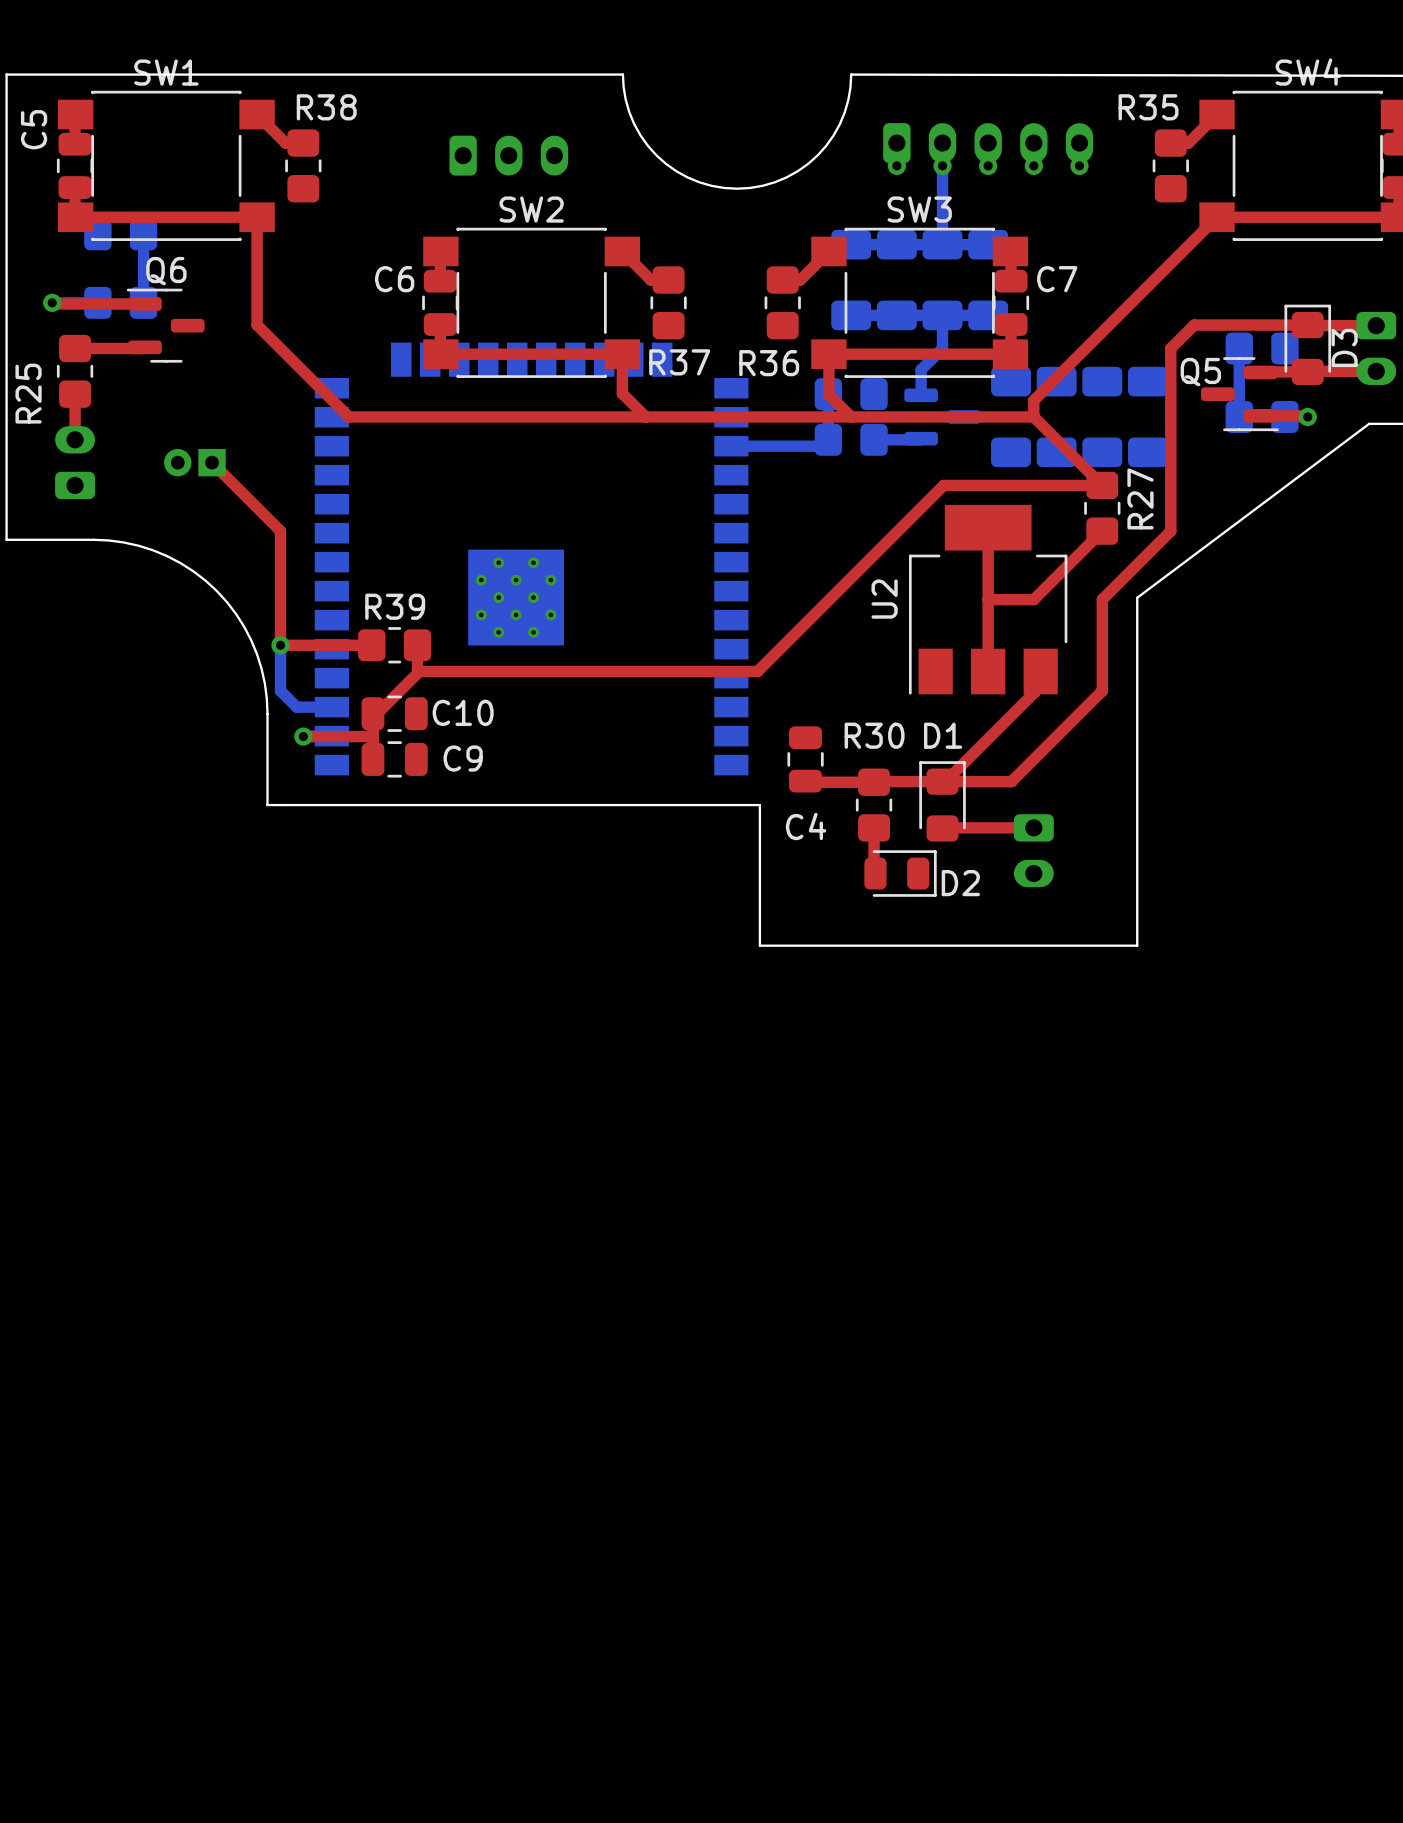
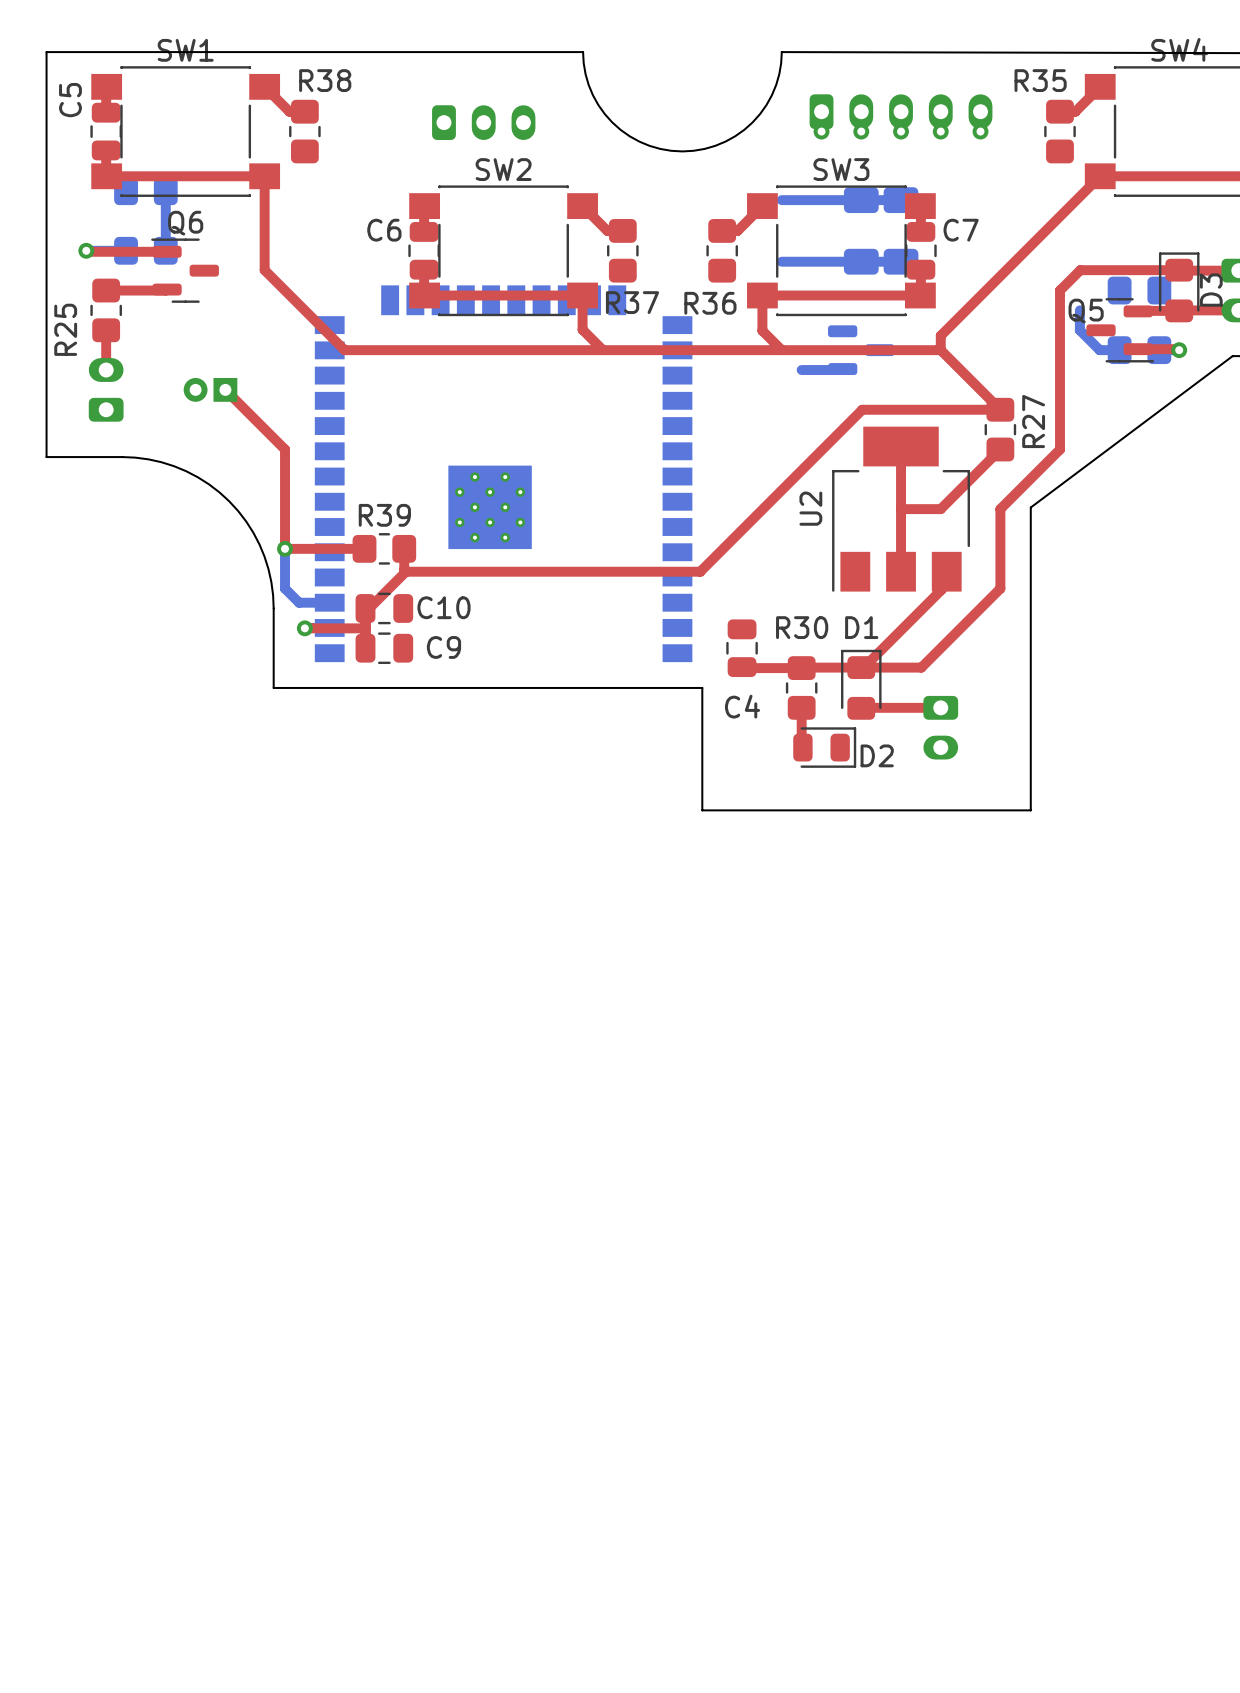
bottom track: (942, 165) (942, 244) -> none
part: (851, 280) -> none
part: (896, 280) -> none
bottom track: (942, 315) (942, 348) (921, 369) (921, 395) -> none
bottom track: (1239, 348) (1239, 416) -> (1079, 310) (1079, 330) (1099, 350) (1119, 350)
bottom track: (828, 394) (828, 439) (821, 446) (731, 446) -> none
part: (851, 394) -> none
part: (1011, 416) -> none
part: (1056, 416) -> none
part: (1102, 416) -> none
part: (1147, 416) -> none
part: (851, 439) -> none

